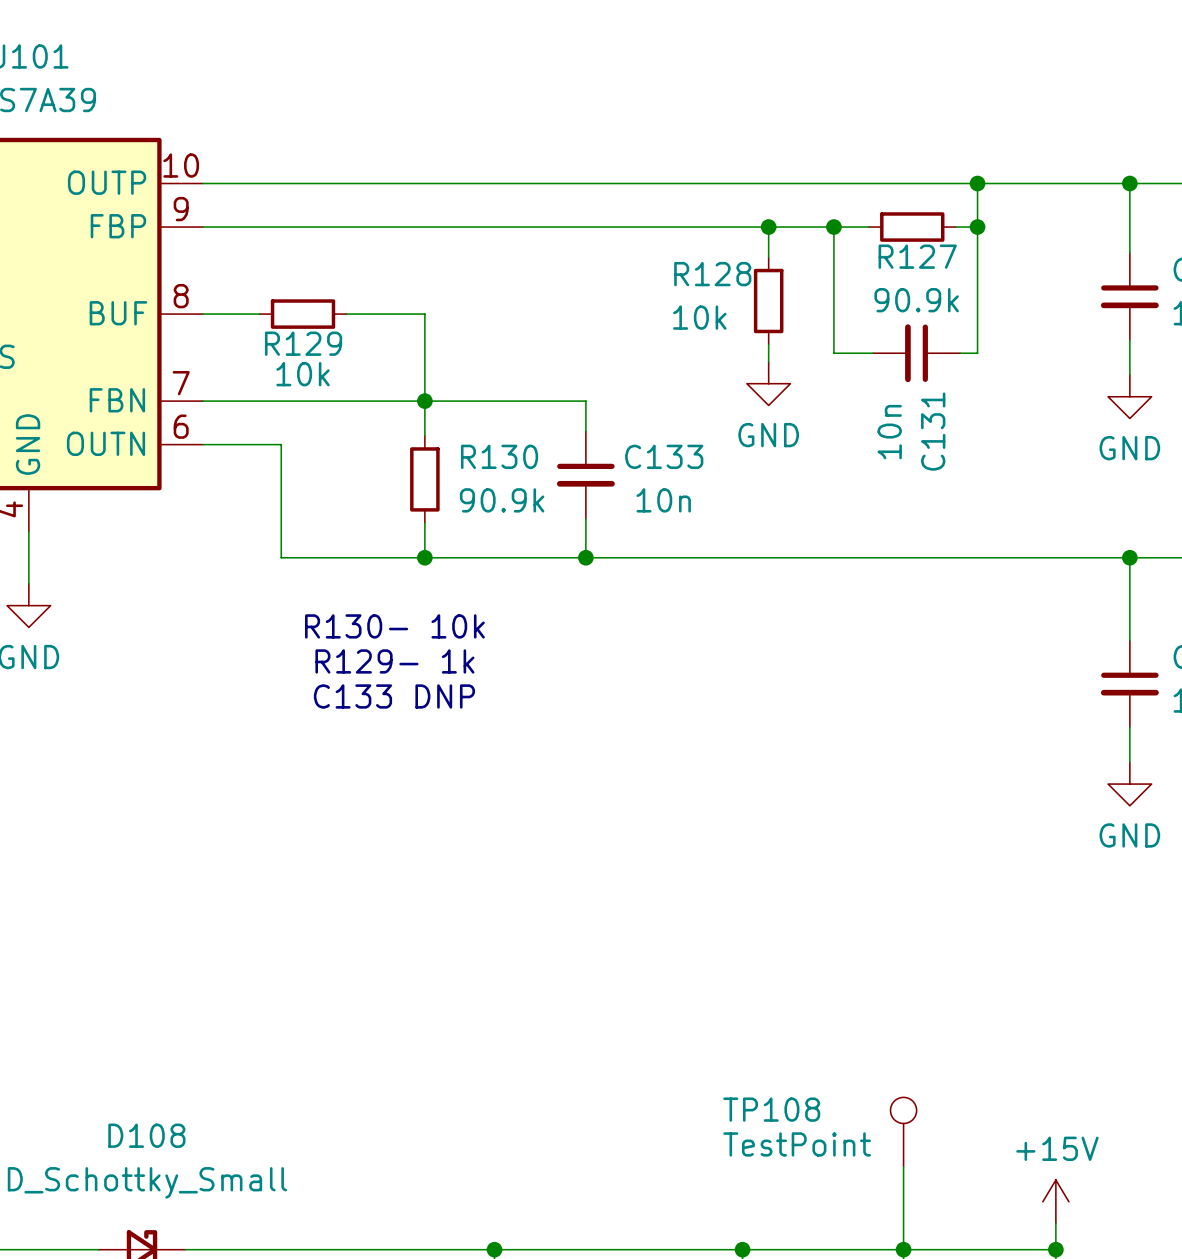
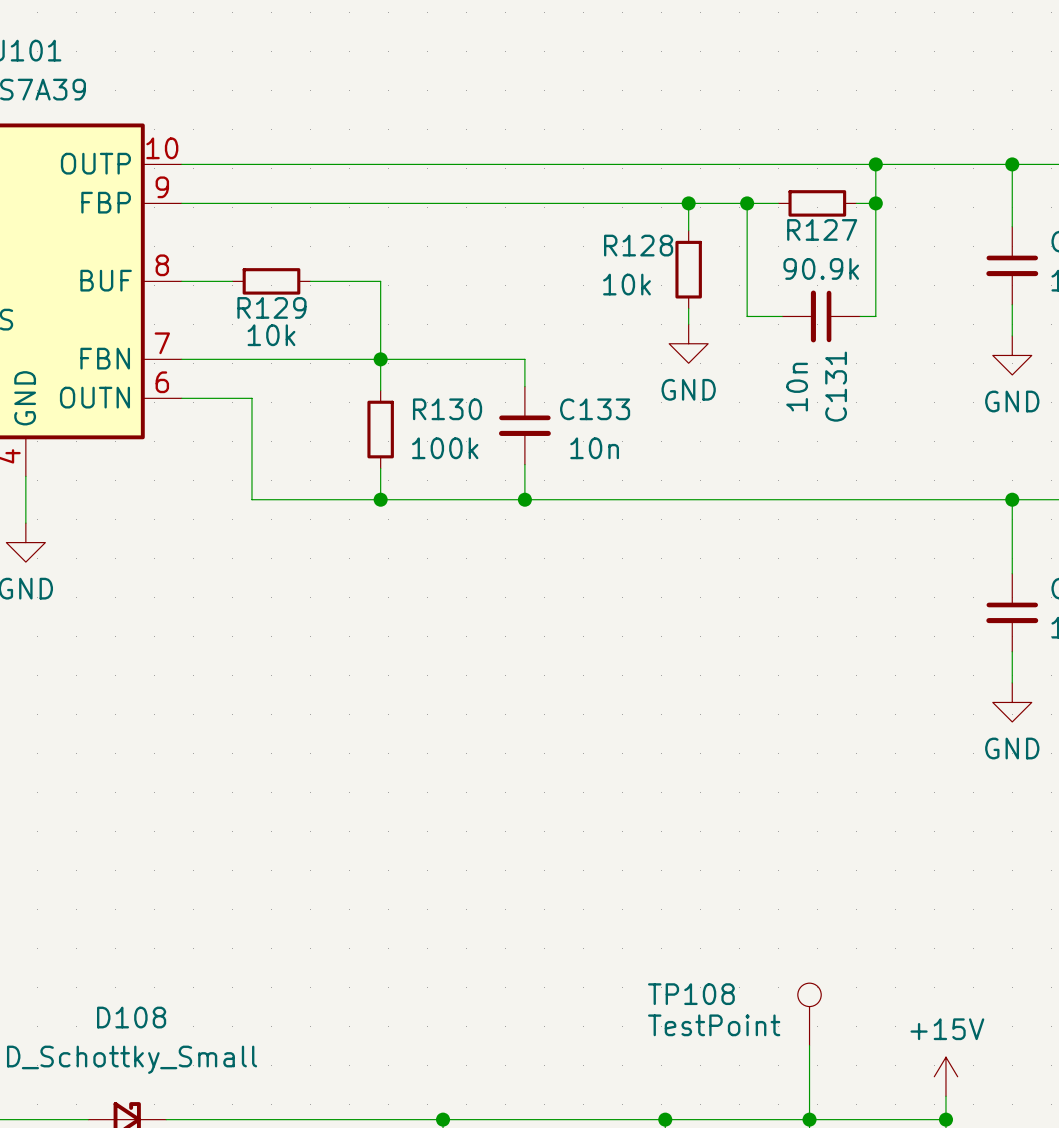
R130 value: 90.9k (502, 500) -> 100k (445, 448)
text: R130- 10k (394, 626) -> none
text: R129- 1k (394, 661) -> none
text: C133 DNP (394, 696) -> none

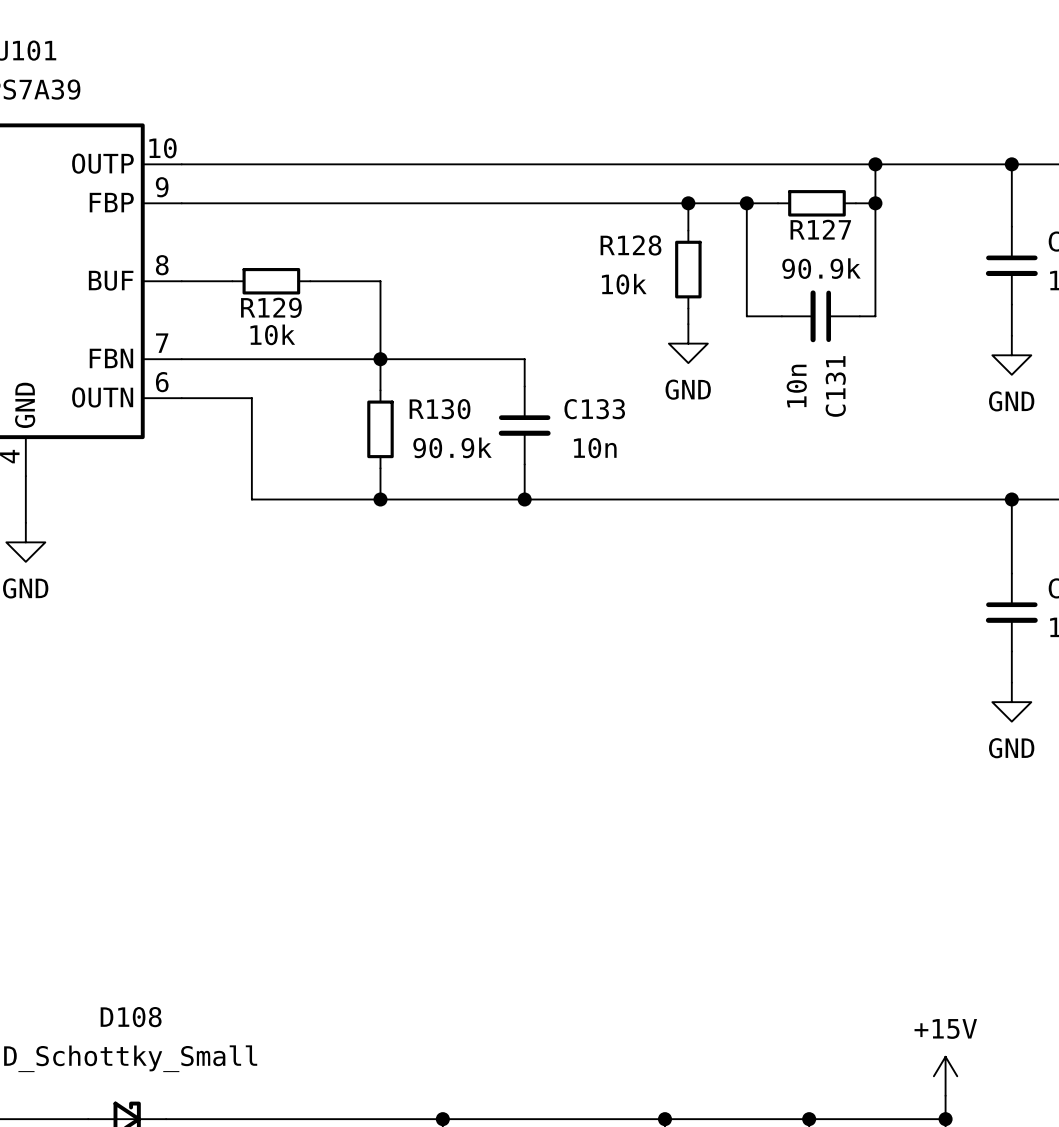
R130 value: 100k (445, 448) -> 90.9k (452, 447)
TP108: TestPoint (809, 1014) -> none
wire: (809, 1045) (809, 1119) -> none

